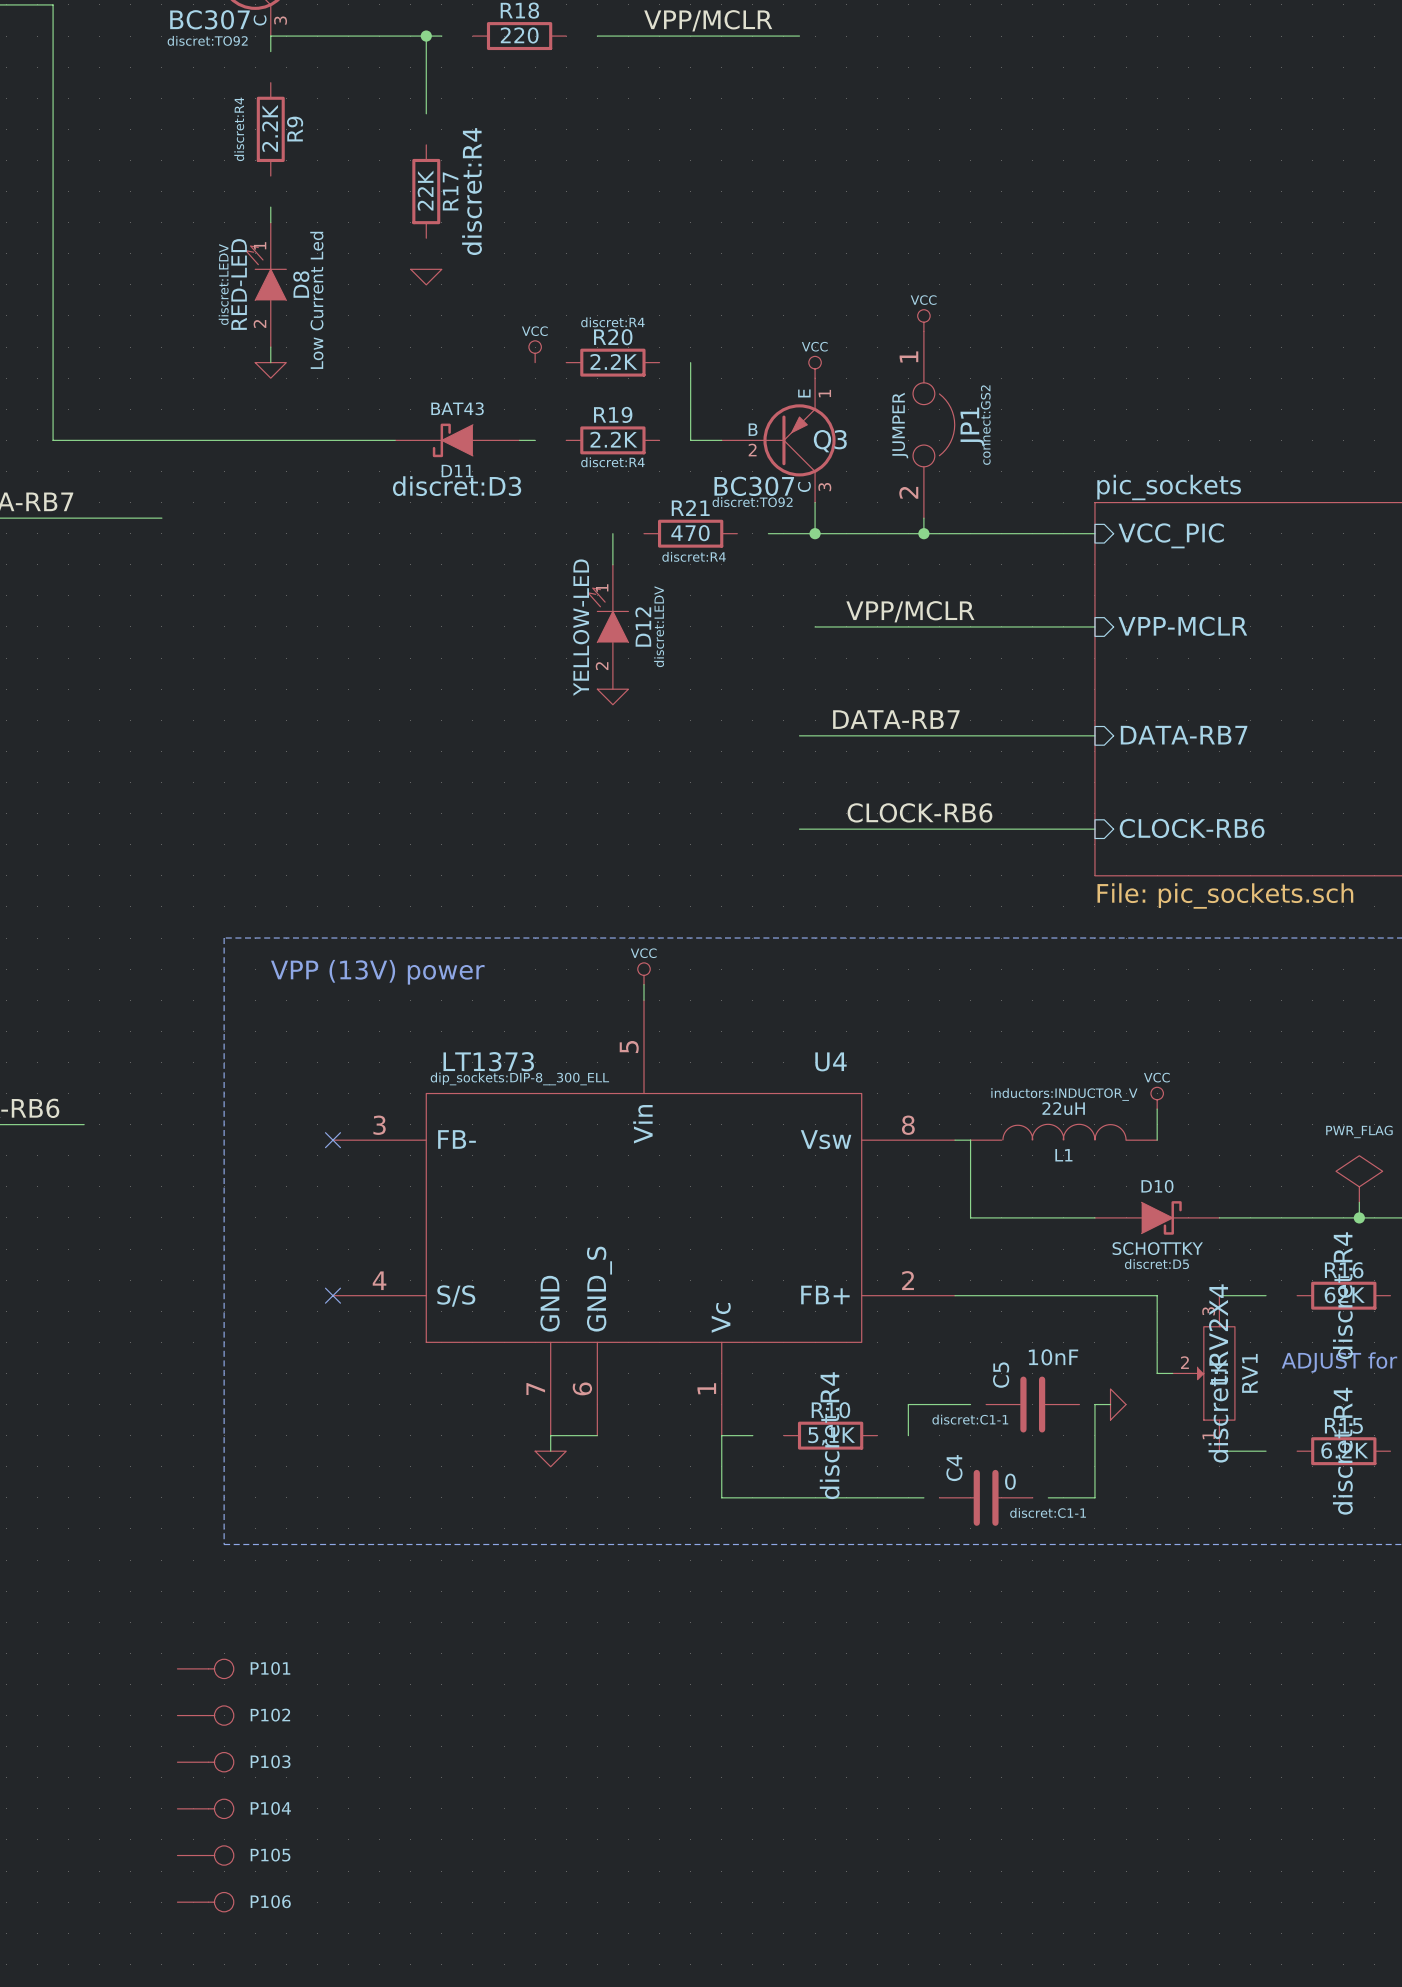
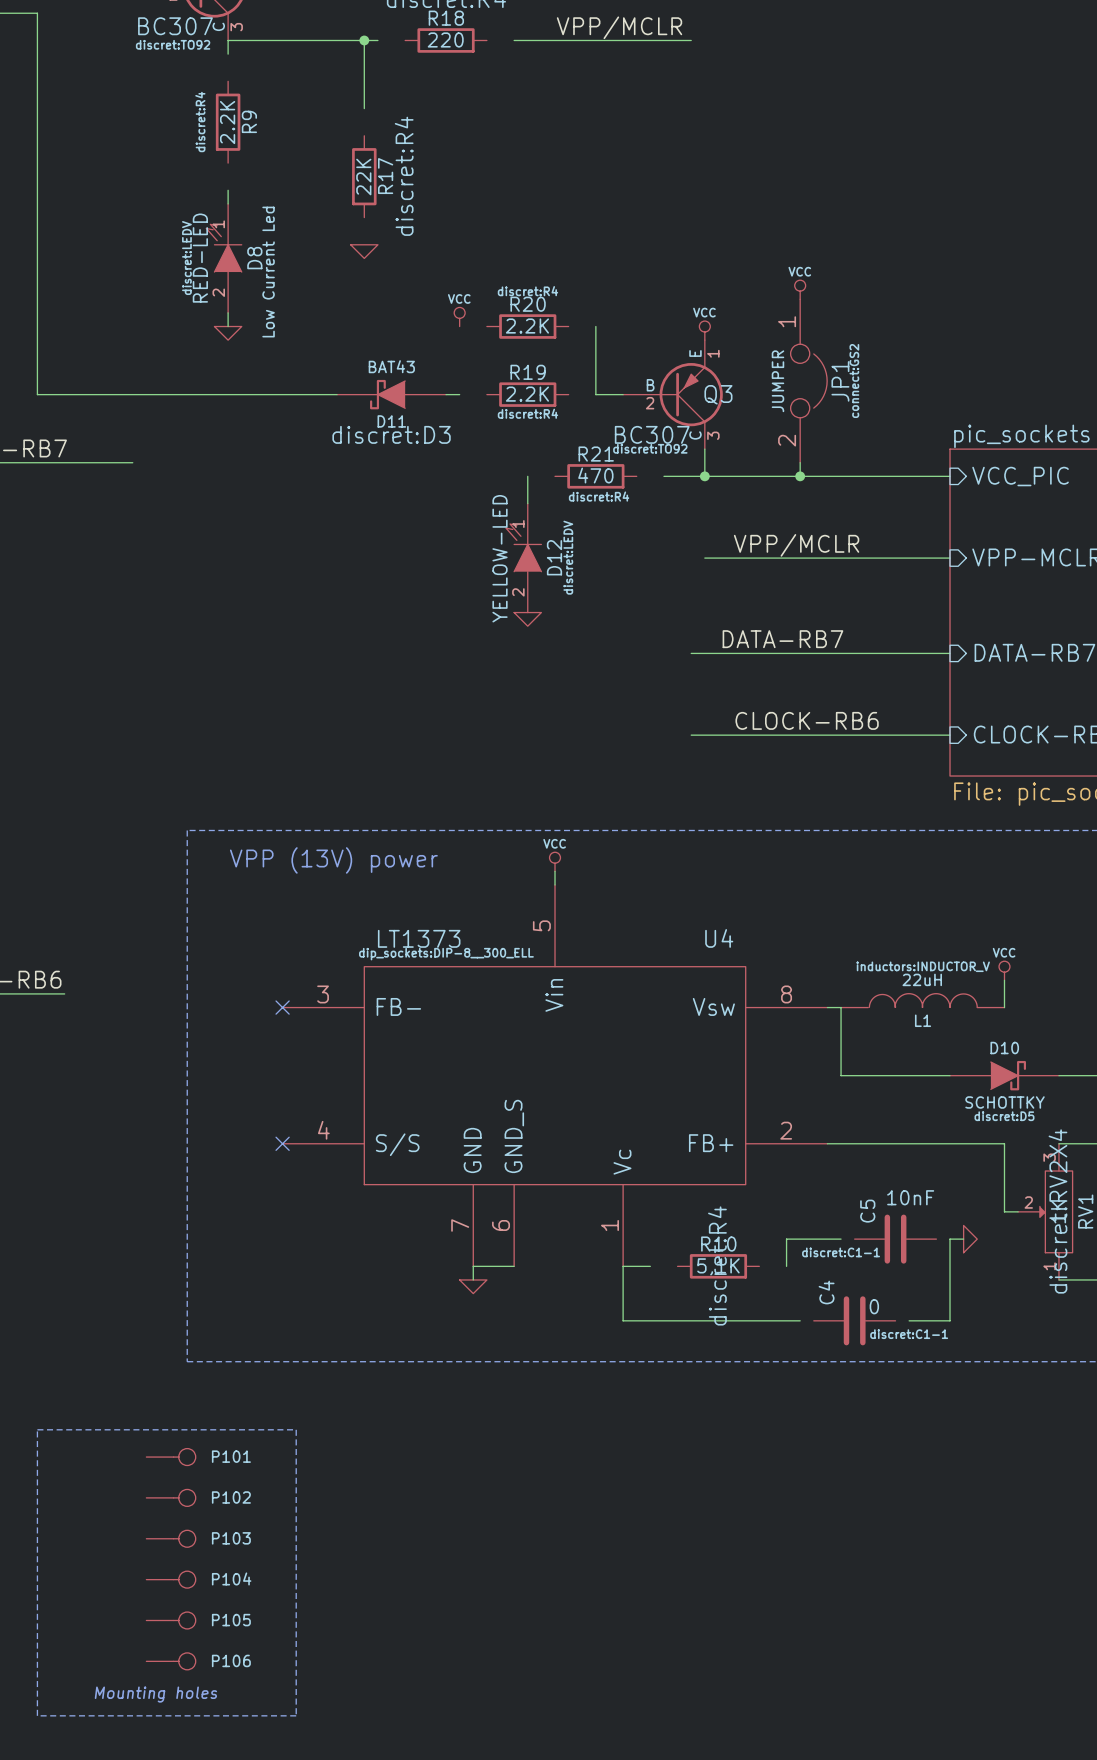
line: none -> (37, 1429) (296, 1429) (296, 1715) (37, 1715) (37, 1429)
P101 position: (205, 1668) -> (171, 1457)
P102 position: (205, 1715) -> (171, 1497)
P103 position: (205, 1762) -> (171, 1538)
P104 position: (205, 1808) -> (171, 1579)
P105 position: (205, 1855) -> (171, 1620)
P106 position: (205, 1902) -> (171, 1661)
text: none -> Mounting holes (155, 1694)

